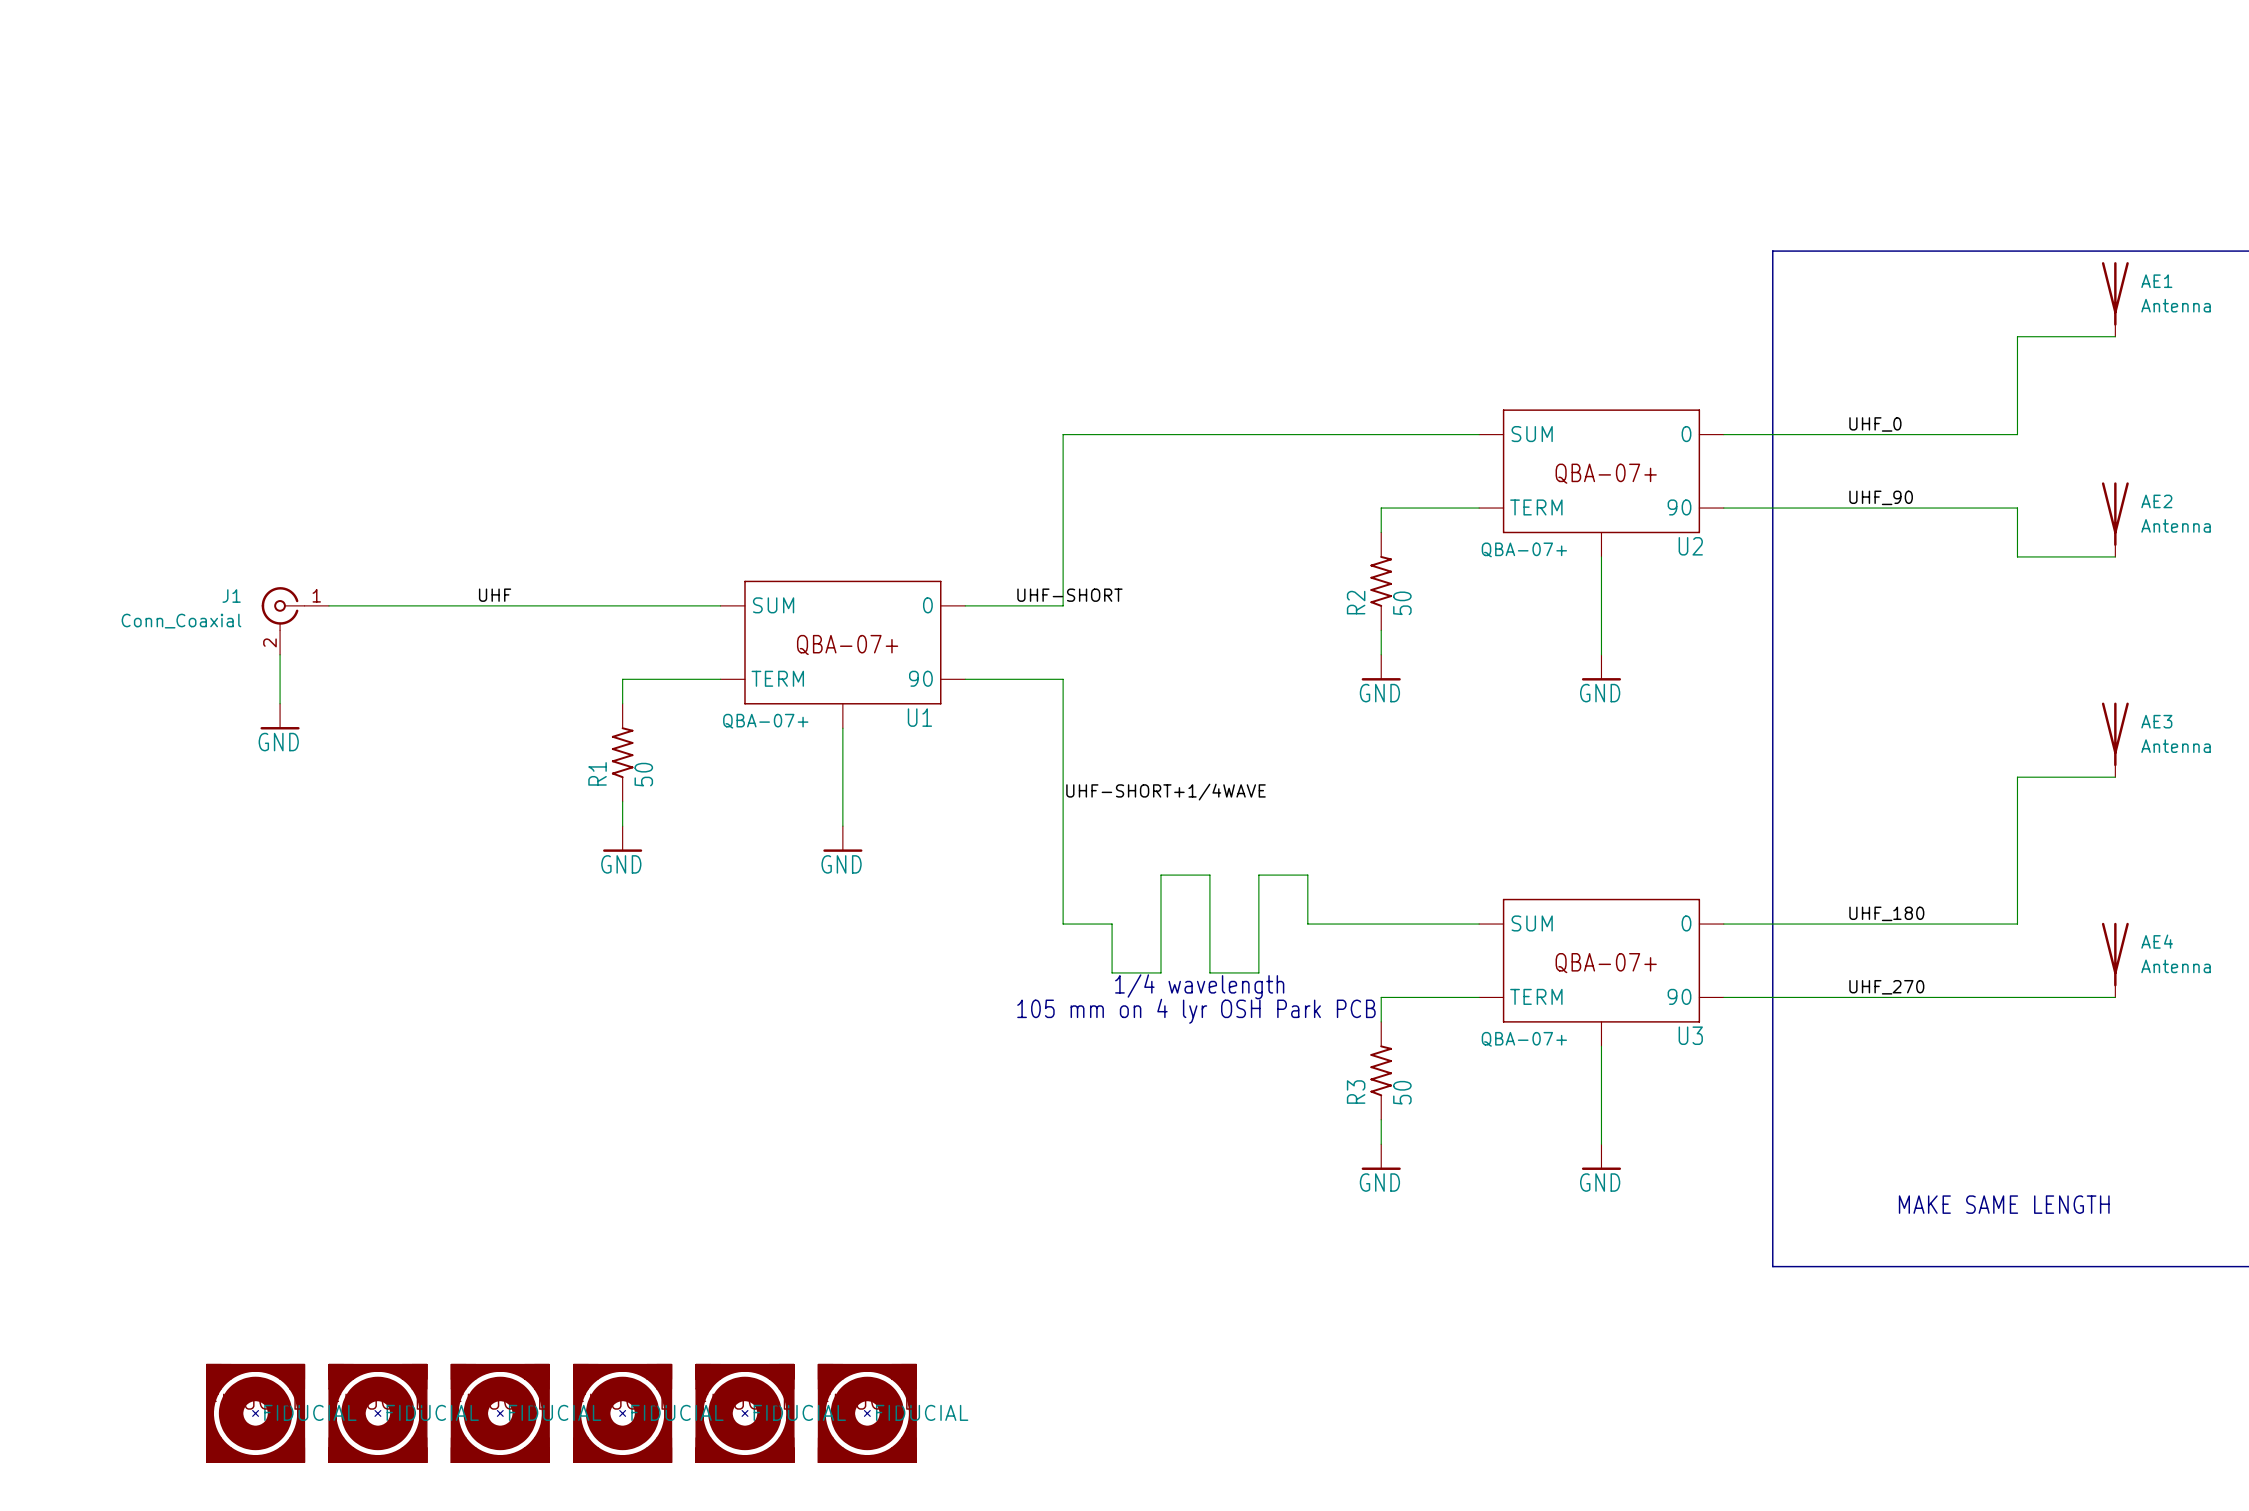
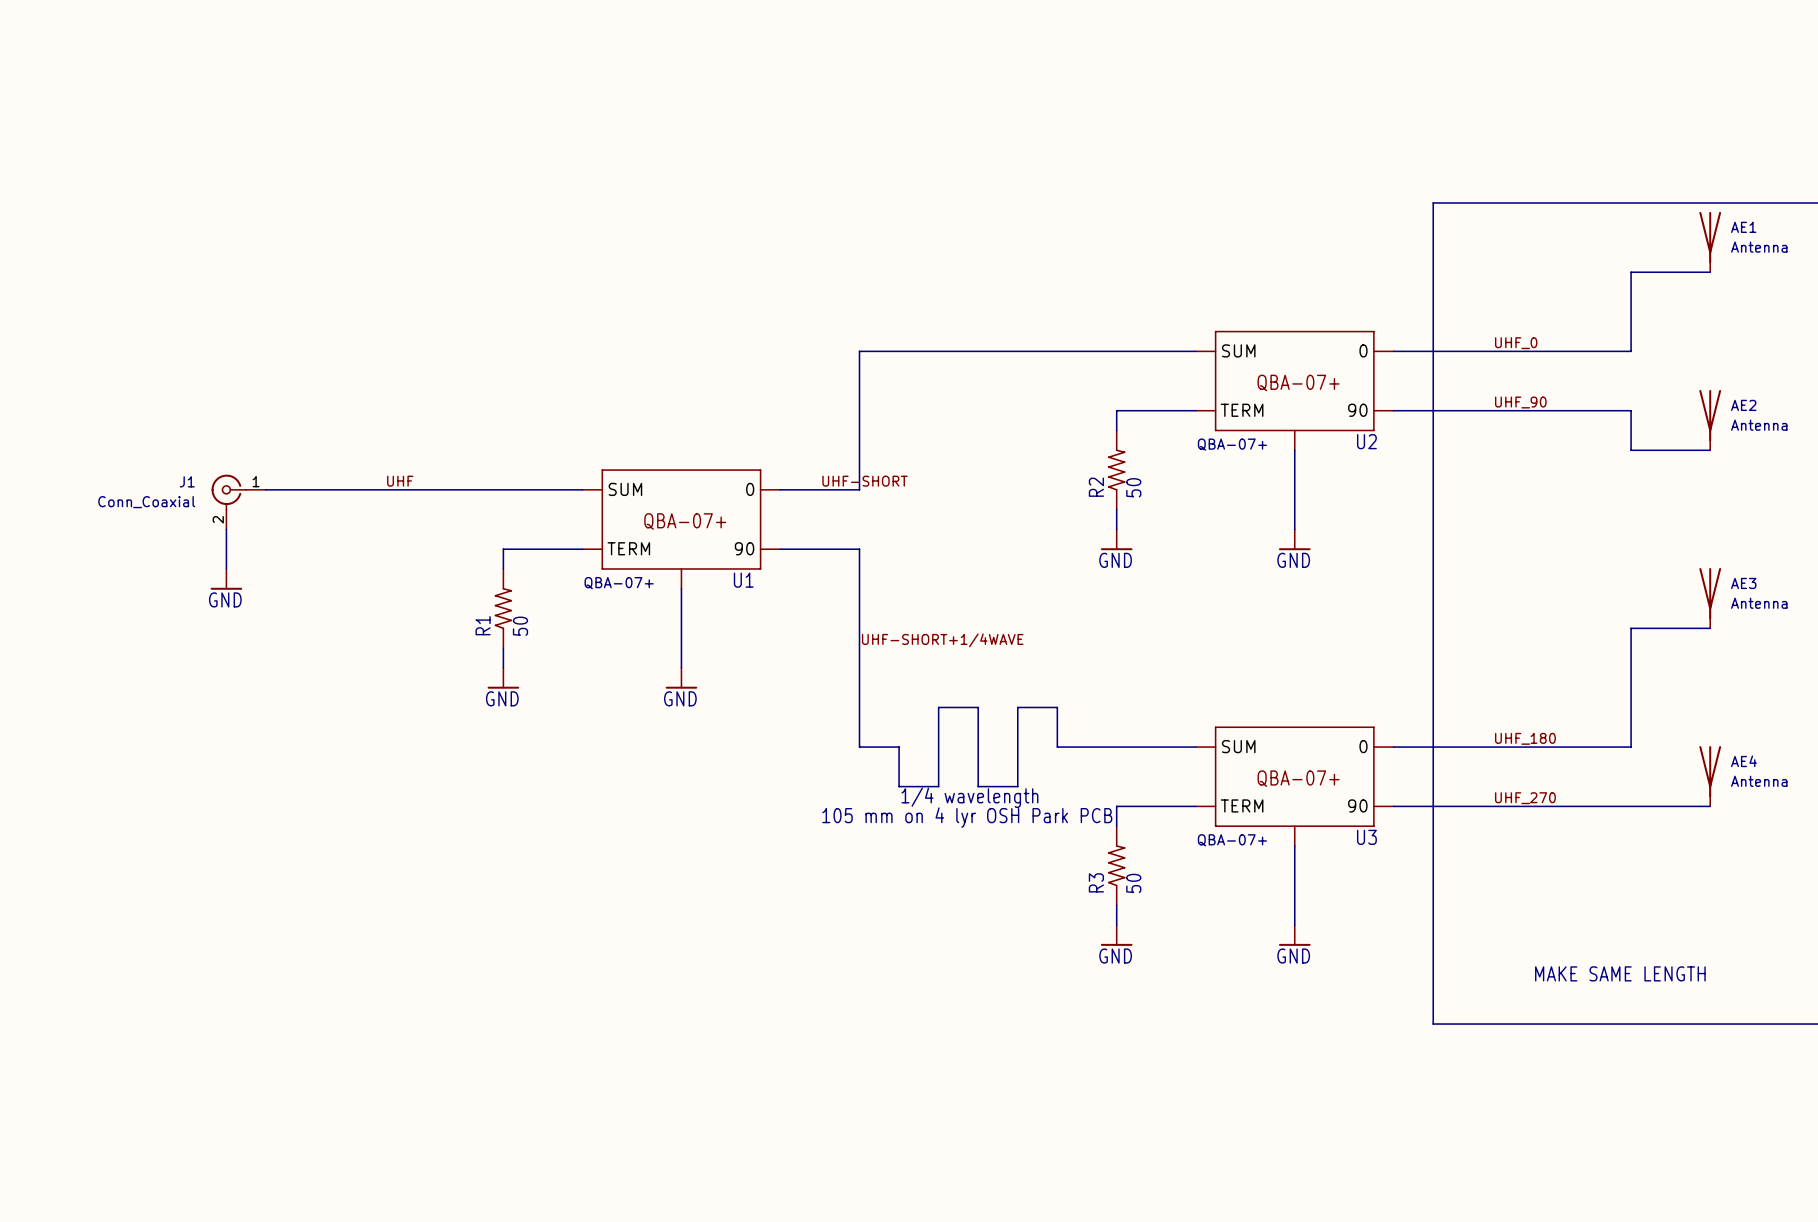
part: (255, 1413) -> none
part: (377, 1413) -> none
part: (500, 1413) -> none
part: (622, 1413) -> none
part: (744, 1413) -> none
part: (867, 1413) -> none

